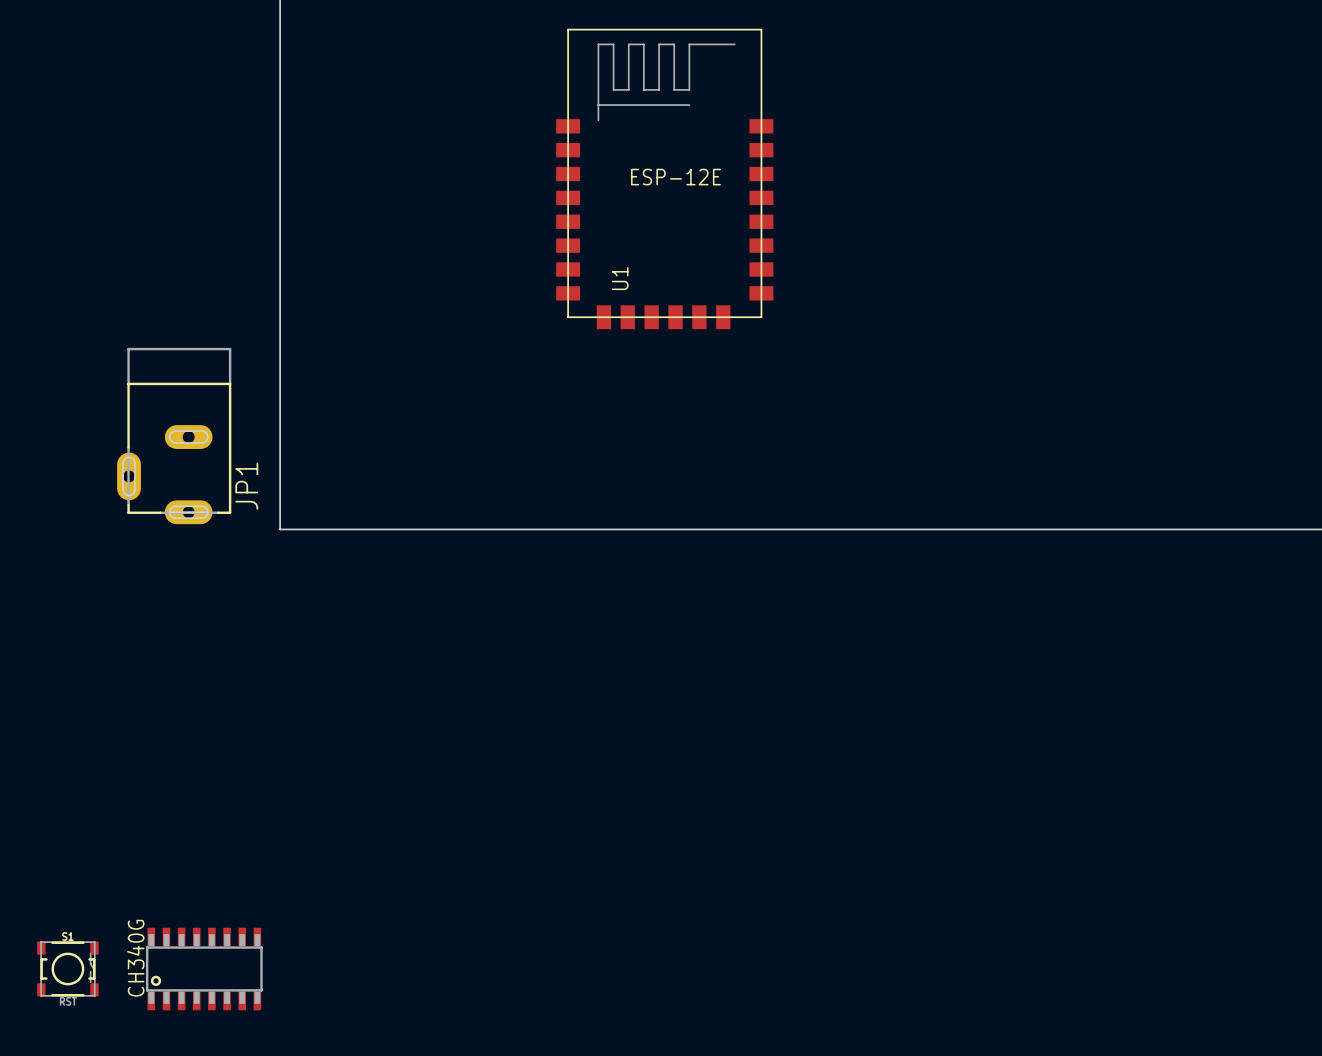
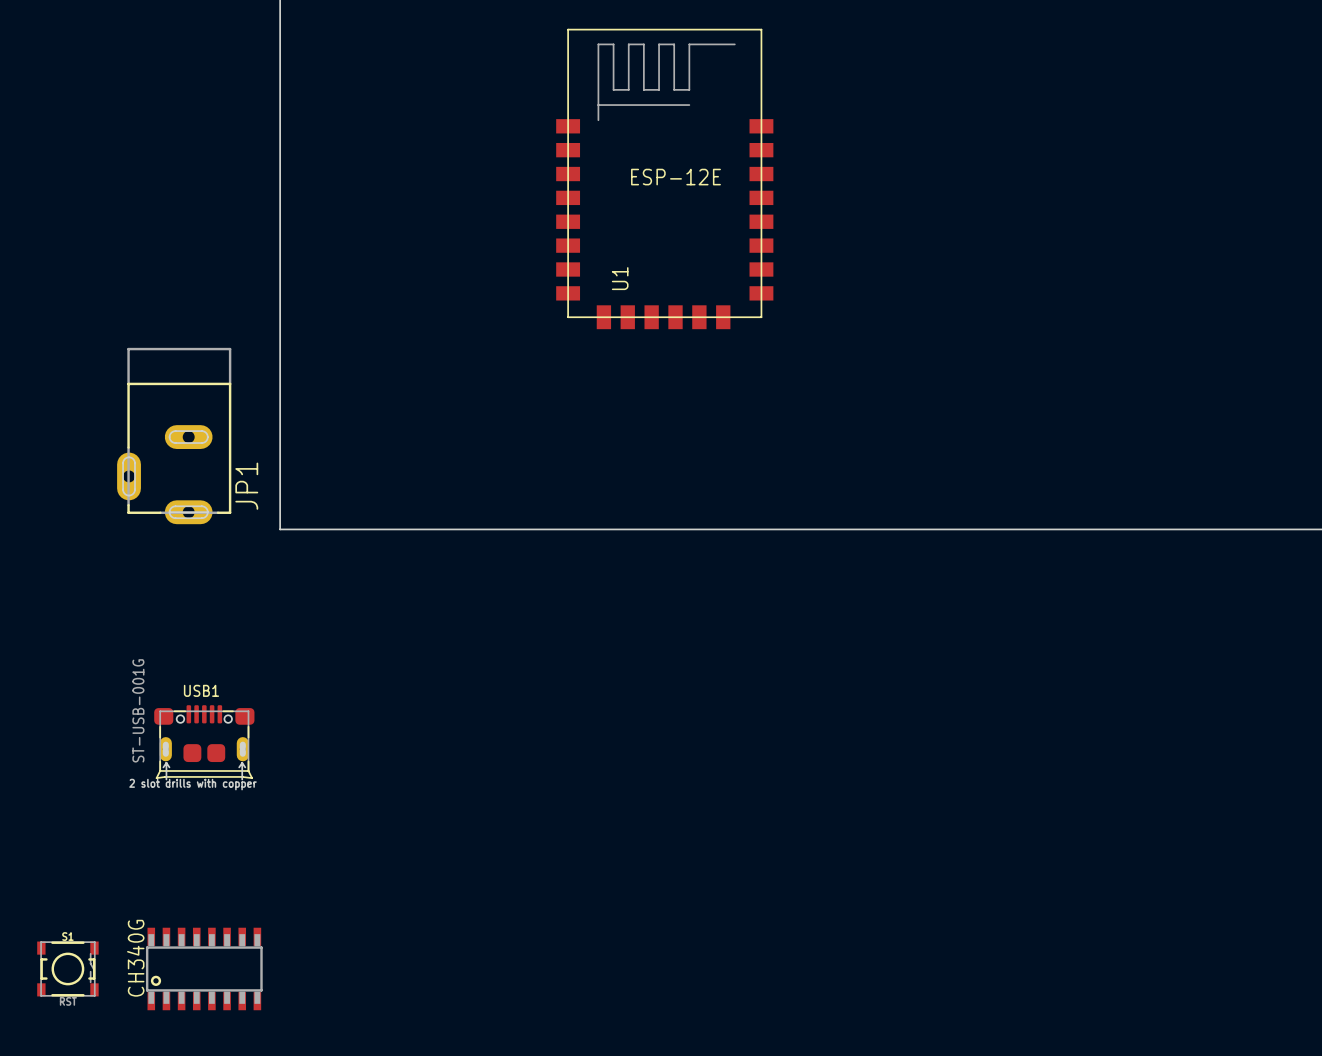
USB1: none -> ST-USB-001G (204, 742)

